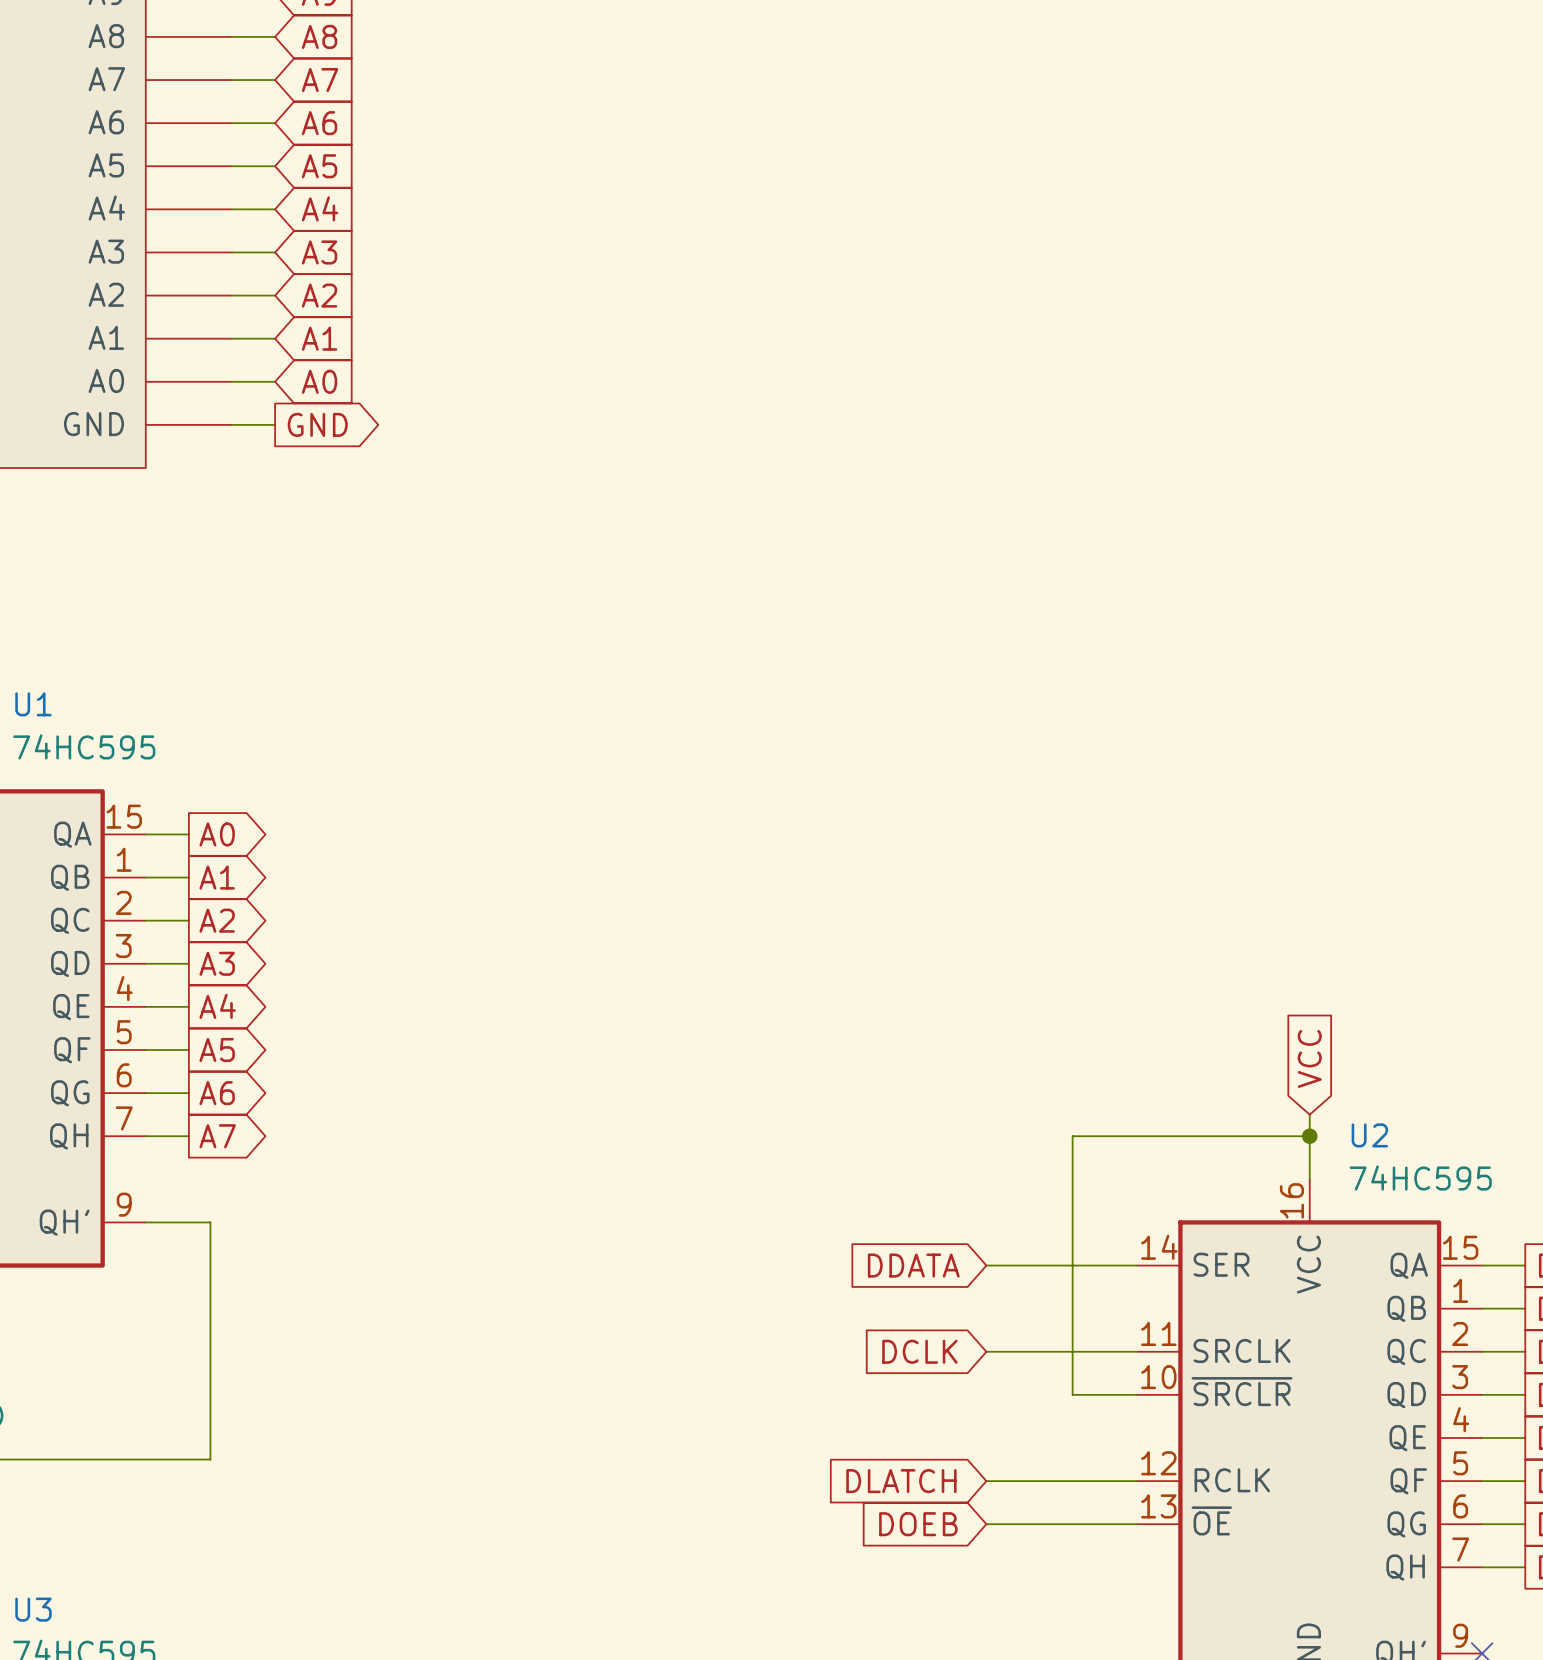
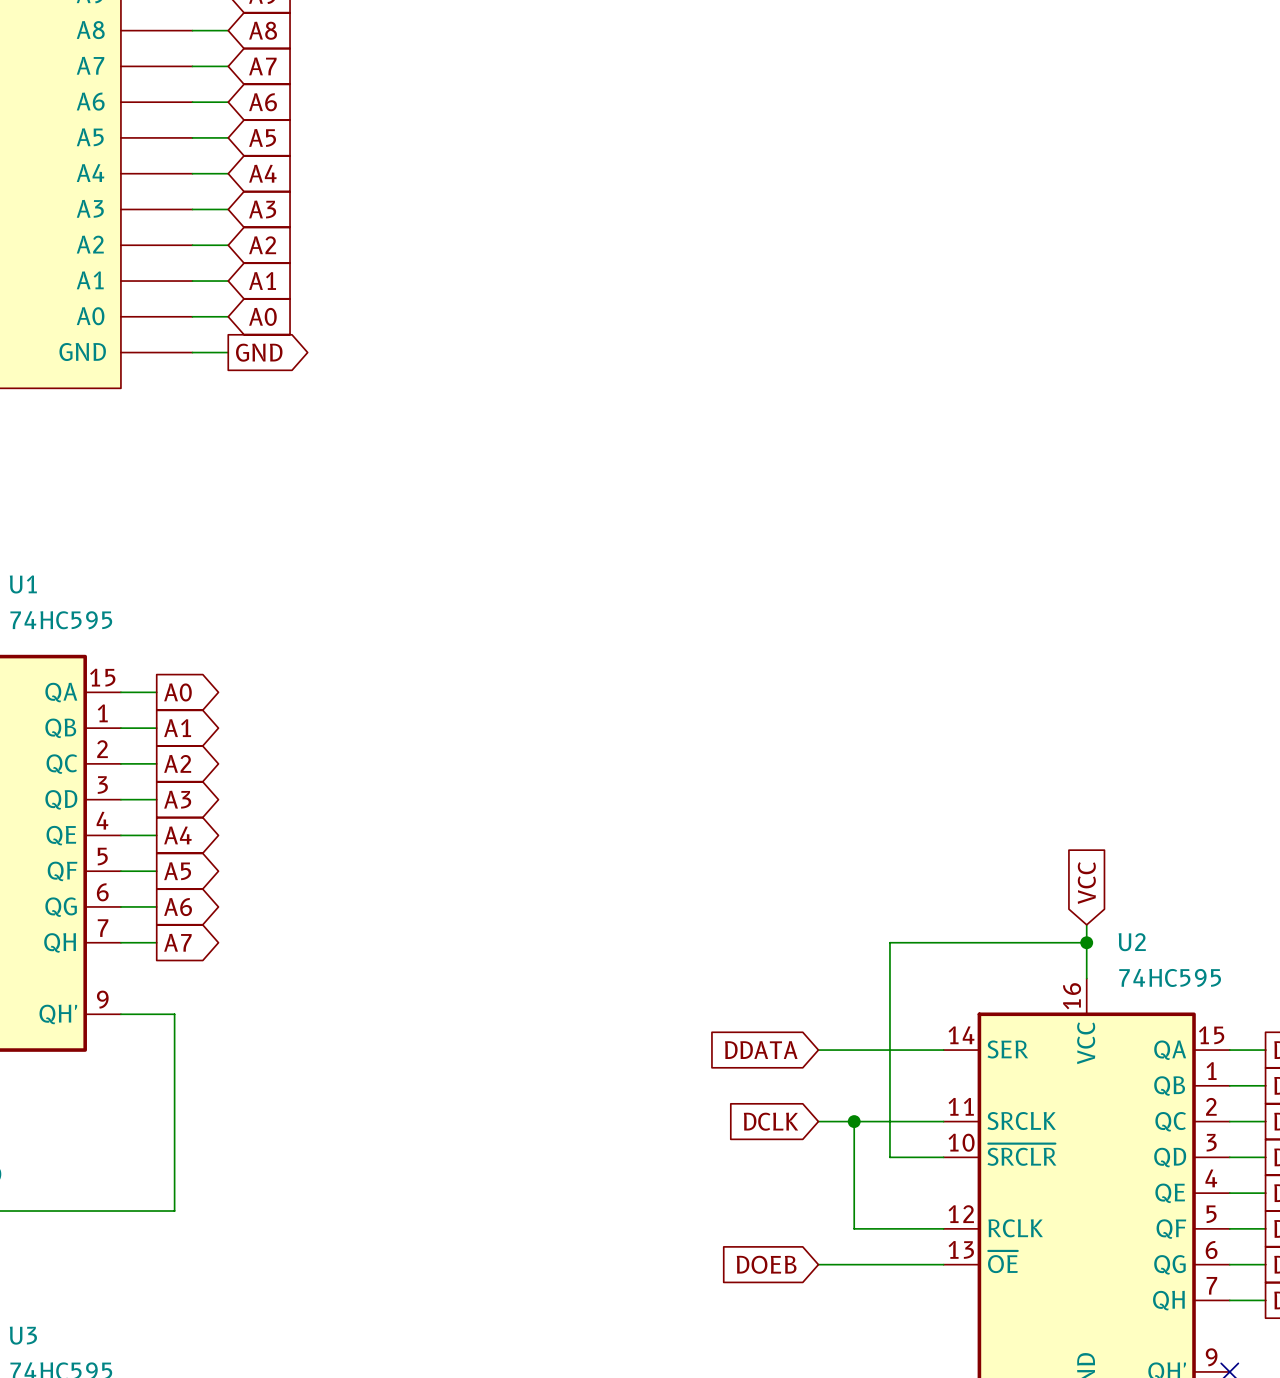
junction: none -> (854, 1121)
global label: DLATCH (901, 1481) -> none
wire: (986, 1481) (1029, 1481) -> (854, 1121) (854, 1228)

